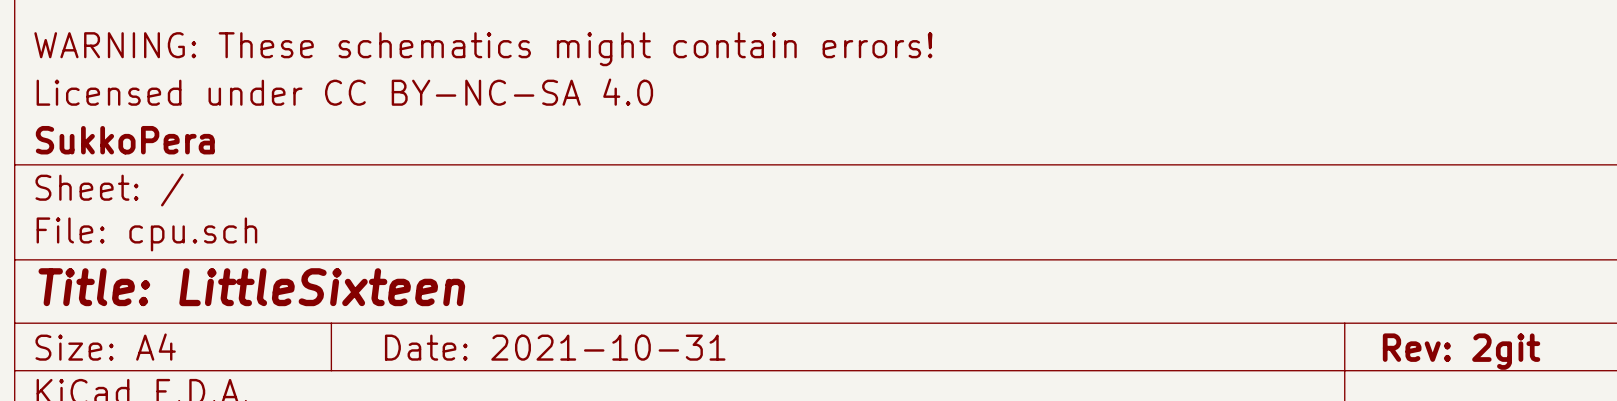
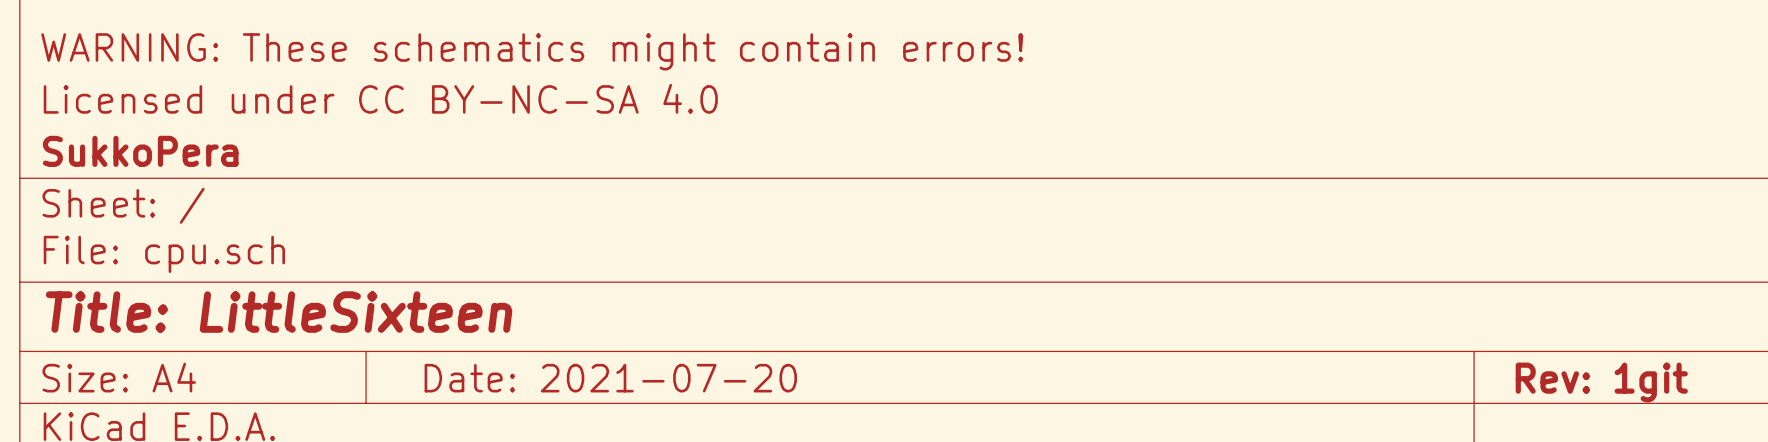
title block: Date: 2021-10-31 (555, 347) -> Date: 2021-07-20 (610, 378)
title block: Rev: 2git (1461, 351) -> Rev: 1git (1601, 382)

